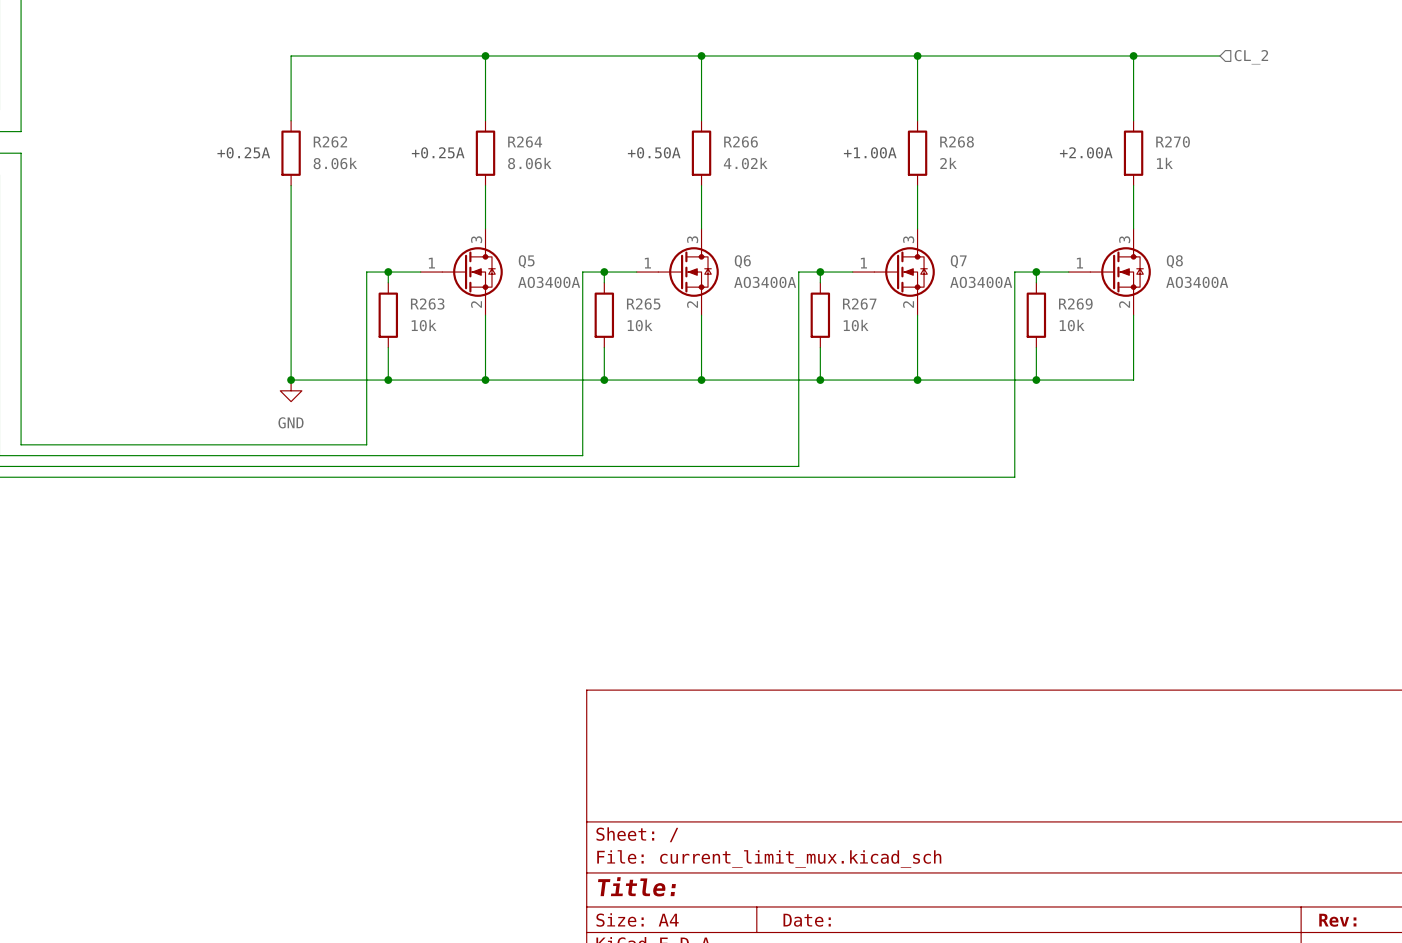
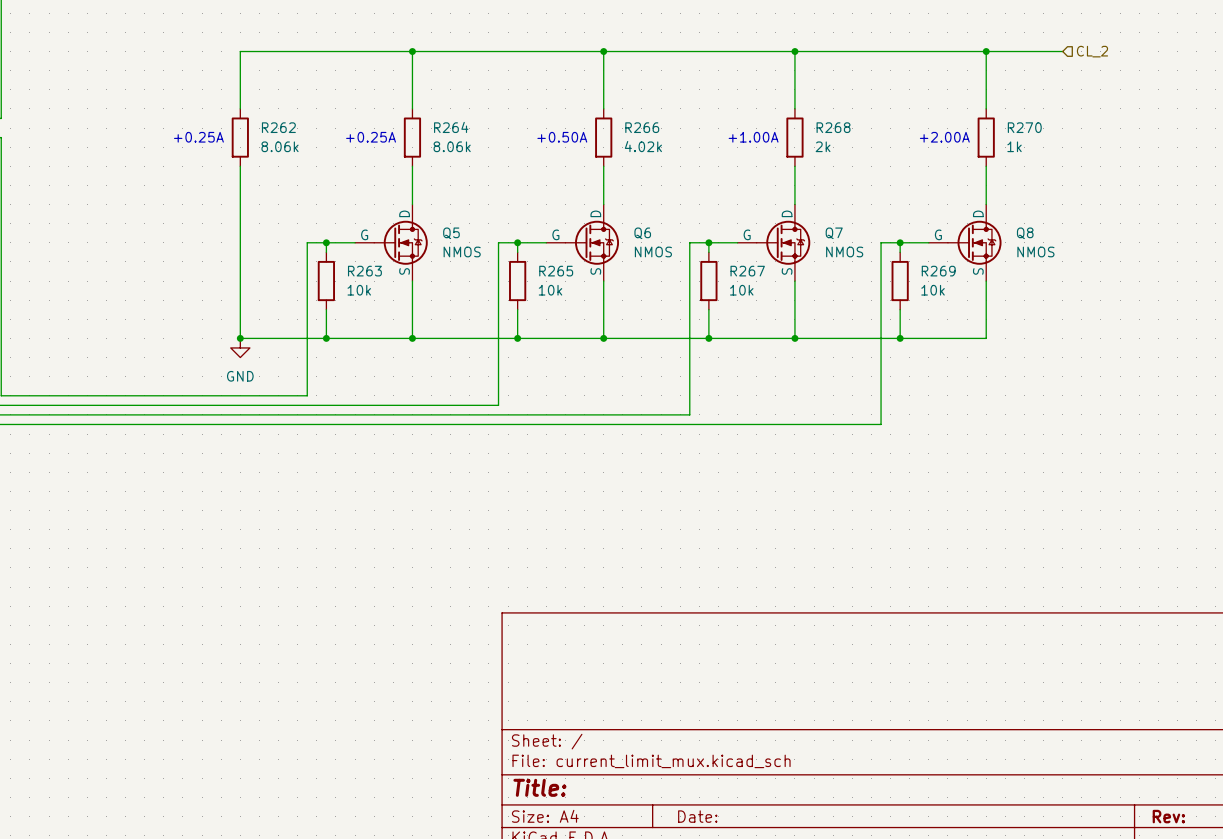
Q5 symbol: [420, 228, 503, 316] -> [355, 204, 428, 282]
Q6 symbol: [636, 228, 719, 316] -> [546, 204, 620, 282]
Q7 symbol: [852, 228, 935, 316] -> [737, 204, 811, 282]
Q8 symbol: [1068, 228, 1151, 316] -> [928, 204, 1002, 282]
Q5 value: AO3400A (549, 282) -> NMOS (462, 251)
Q6 value: AO3400A (765, 282) -> NMOS (653, 251)
Q7 value: AO3400A (981, 282) -> NMOS (844, 251)
Q8 value: AO3400A (1197, 282) -> NMOS (1035, 251)

